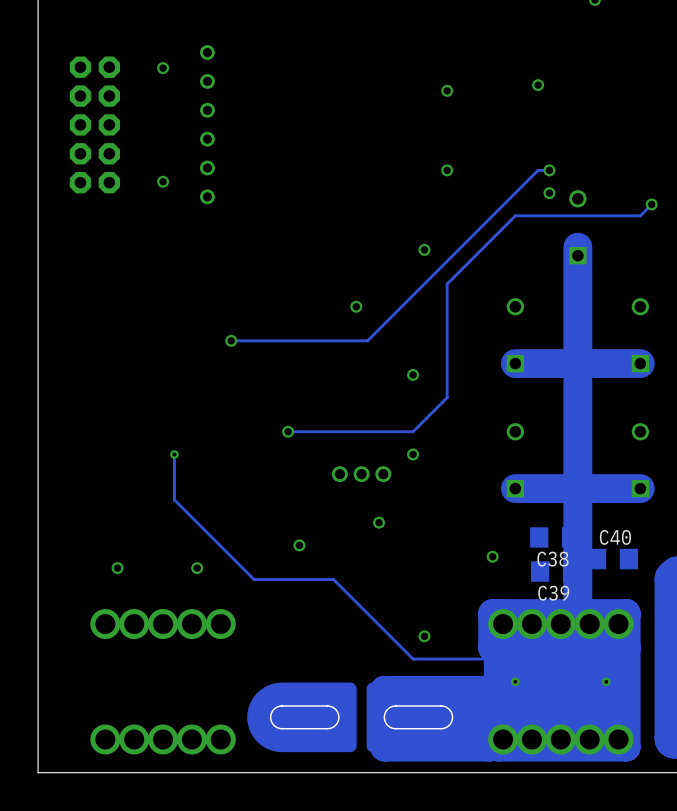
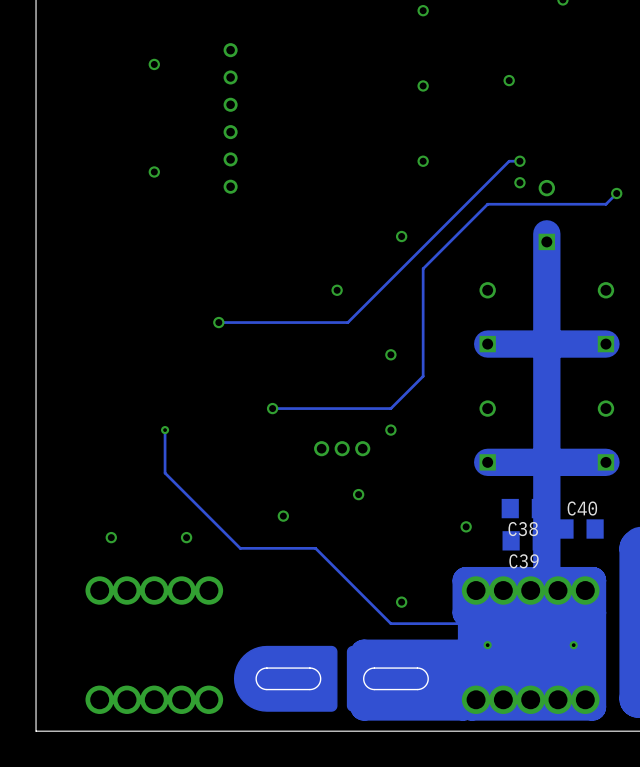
via: none -> (423, 10)
part: (94, 124) -> none
part position: (207, 124) -> (230, 118)

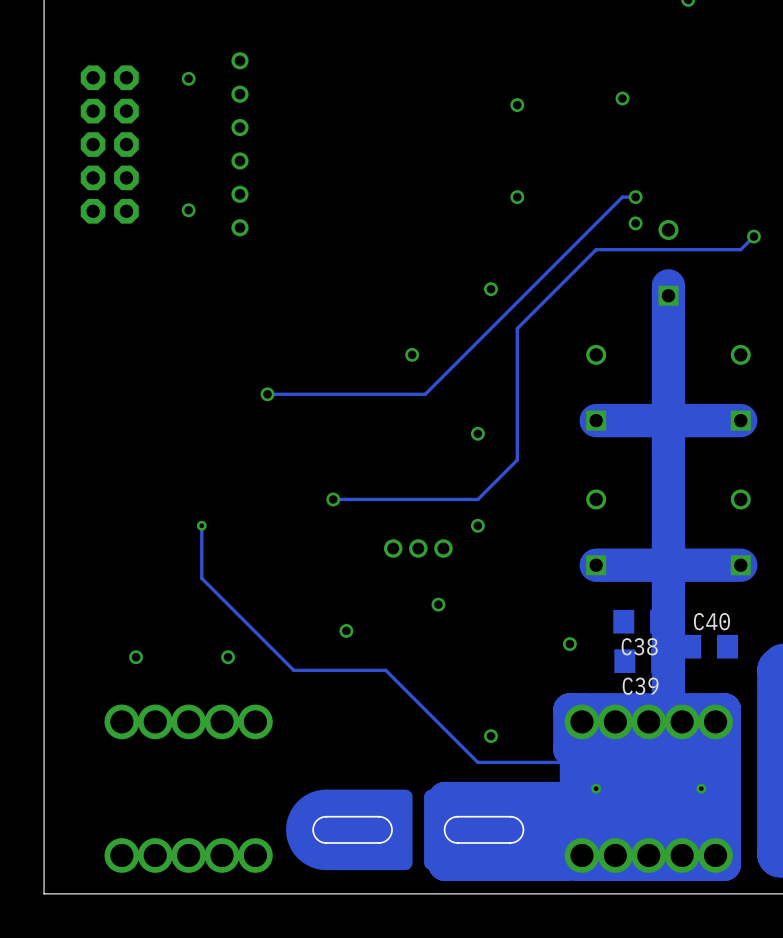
via: (423, 10) -> none
part: none -> (109, 144)
part position: (230, 118) -> (239, 144)

